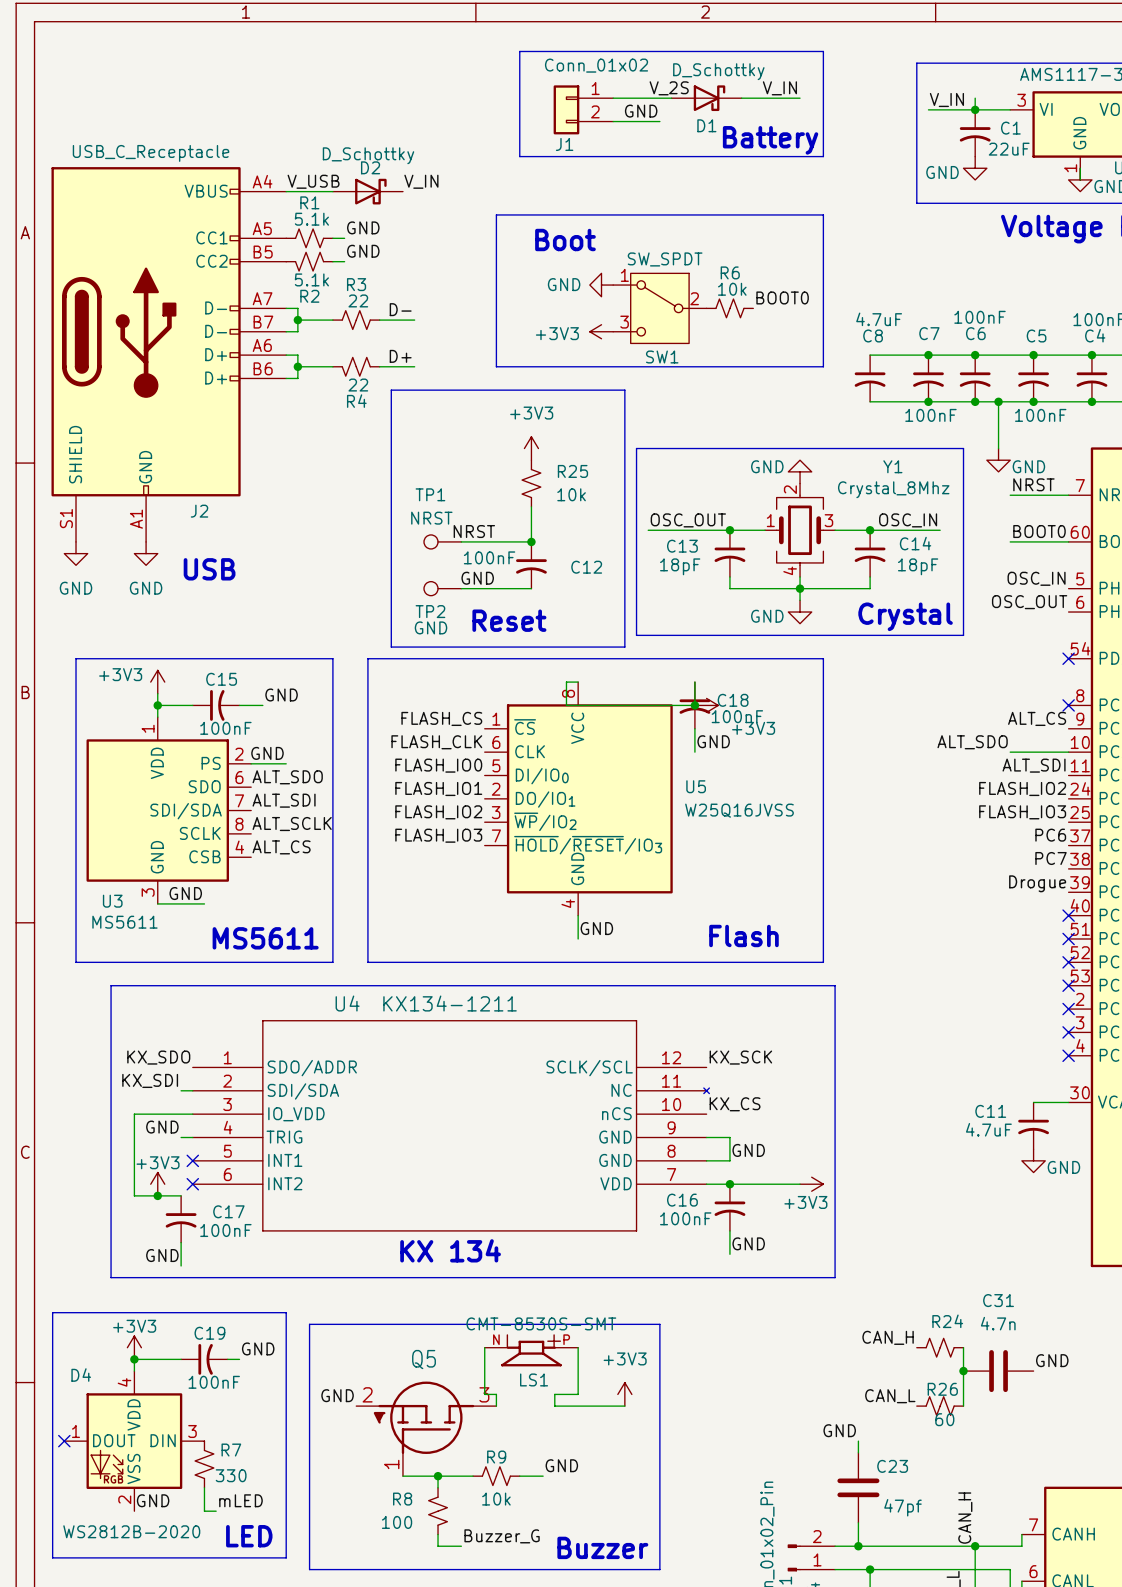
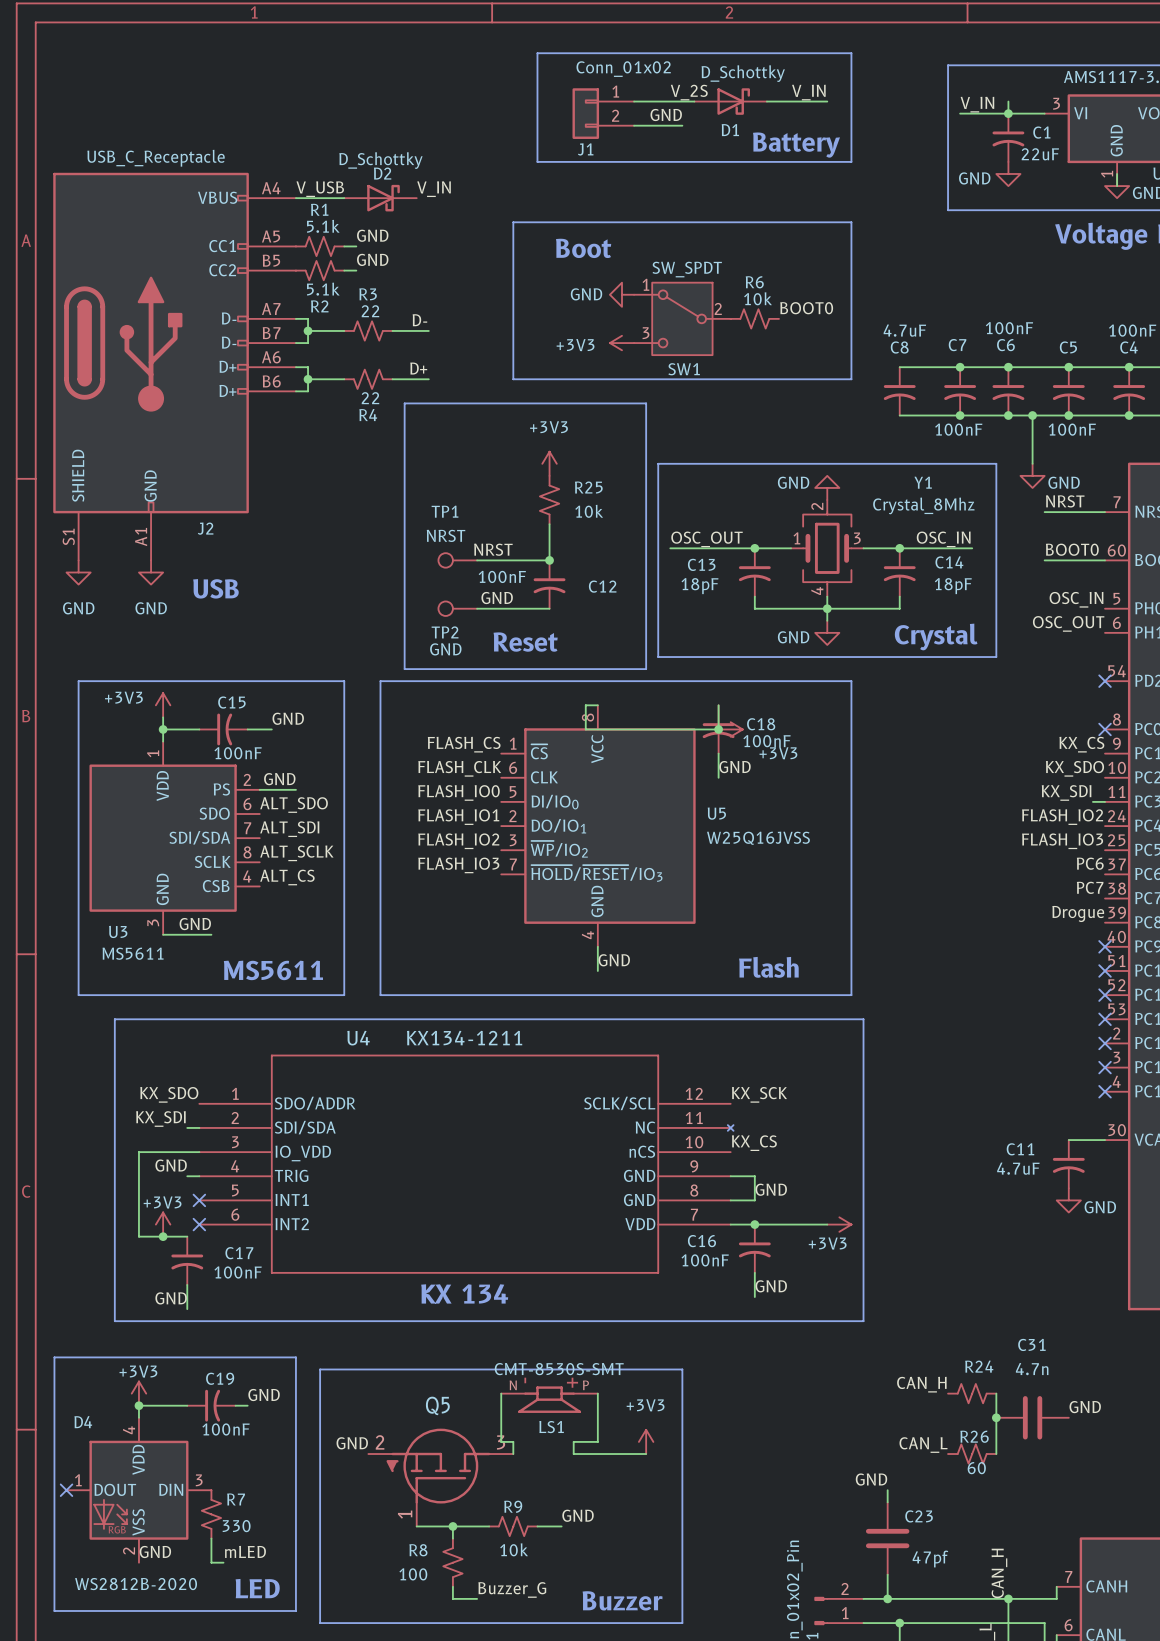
label: ALT_CS (1037, 718) -> KX_CS (1081, 744)
label: ALT_SDO (972, 742) -> KX_SDO (1074, 768)
wire: (1010, 752) (1068, 752) -> none
label: ALT_SDI (1034, 765) -> KX_SDI (1066, 792)
wire: none -> (1092, 801) (1105, 801)

